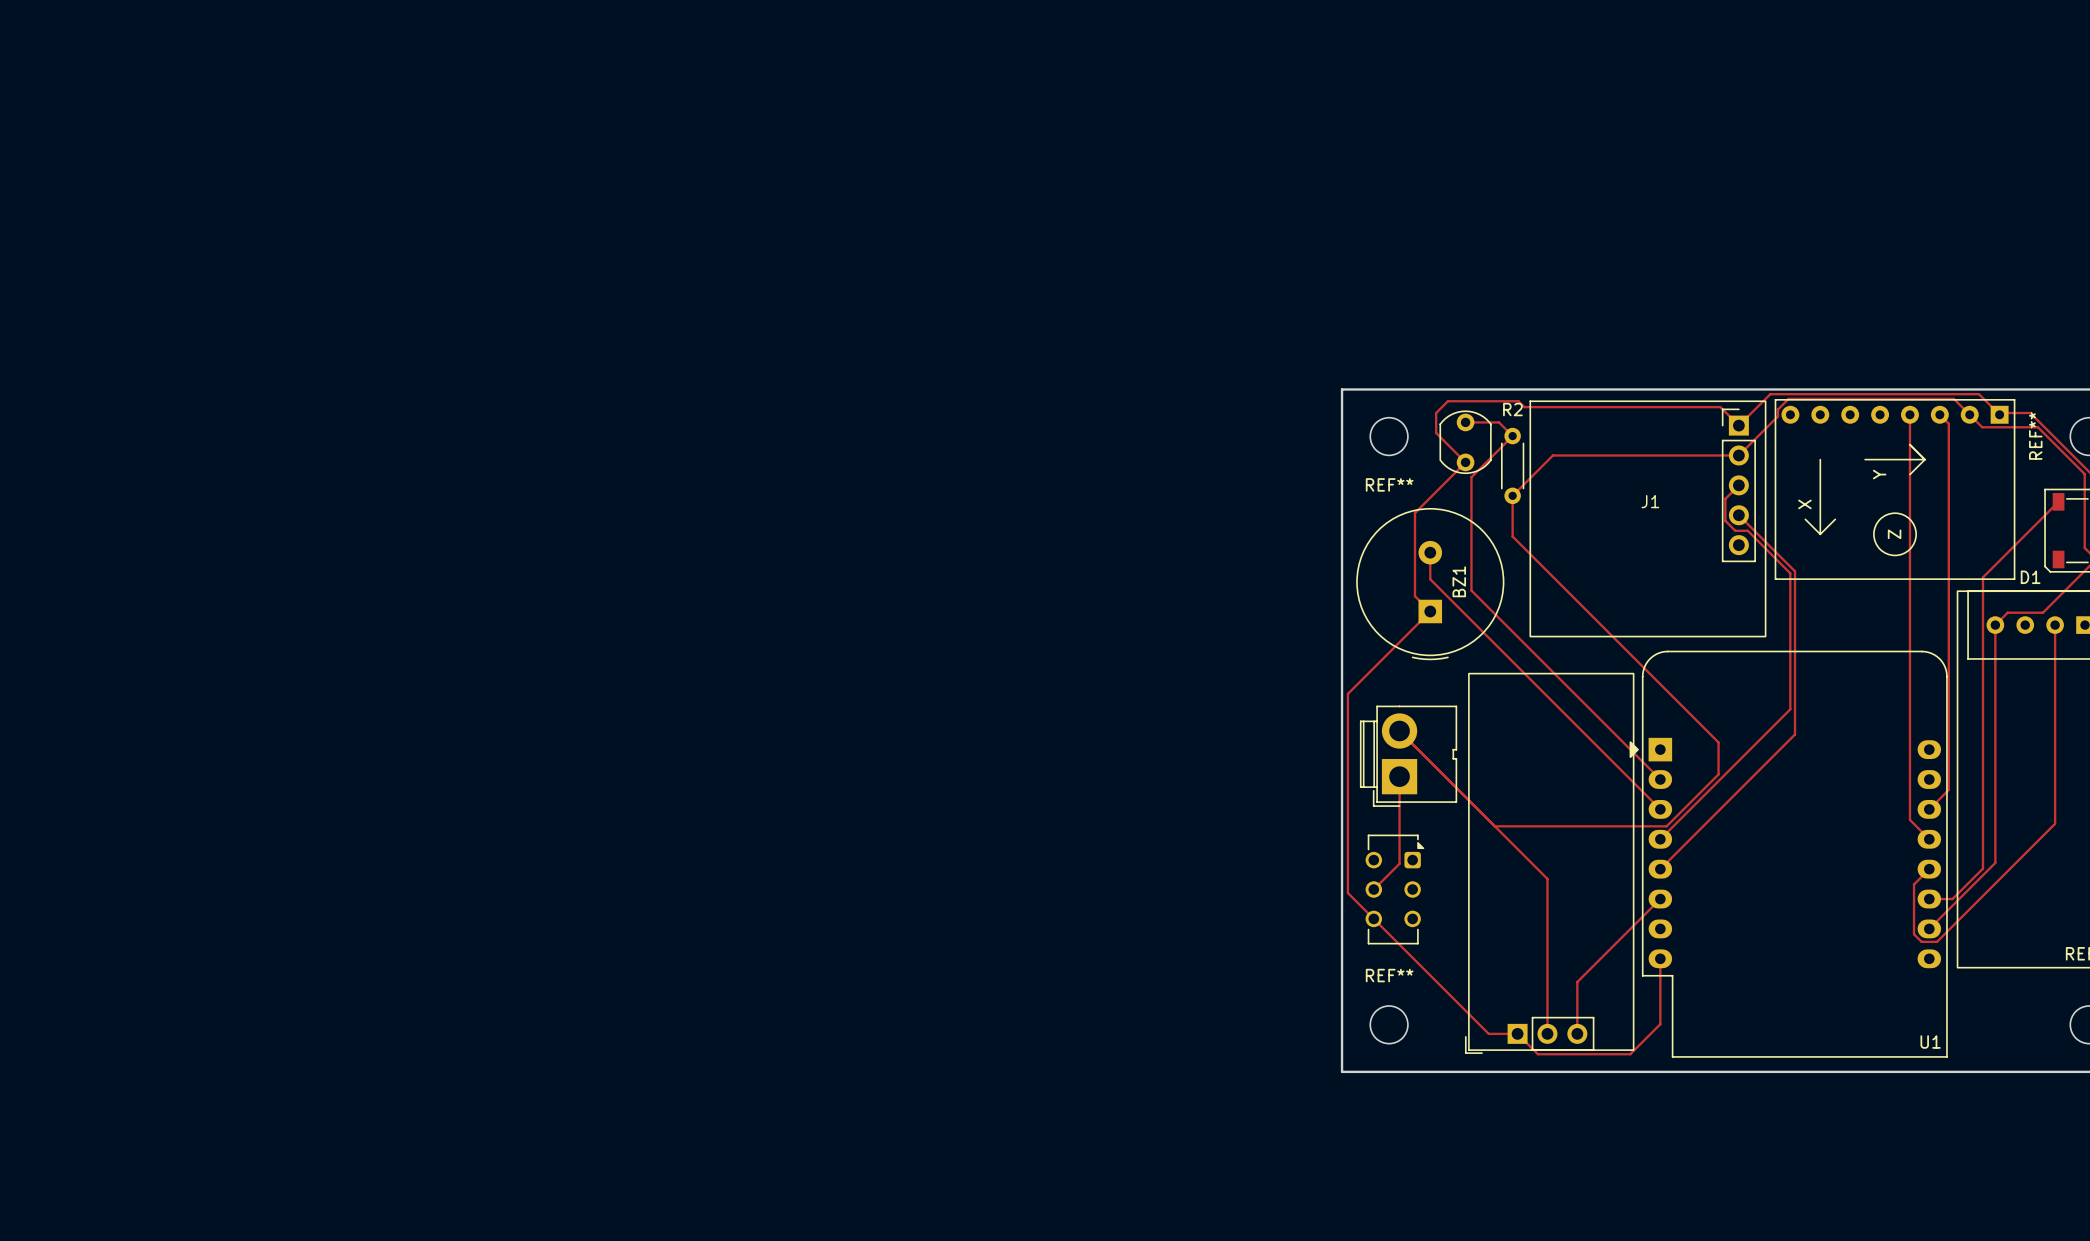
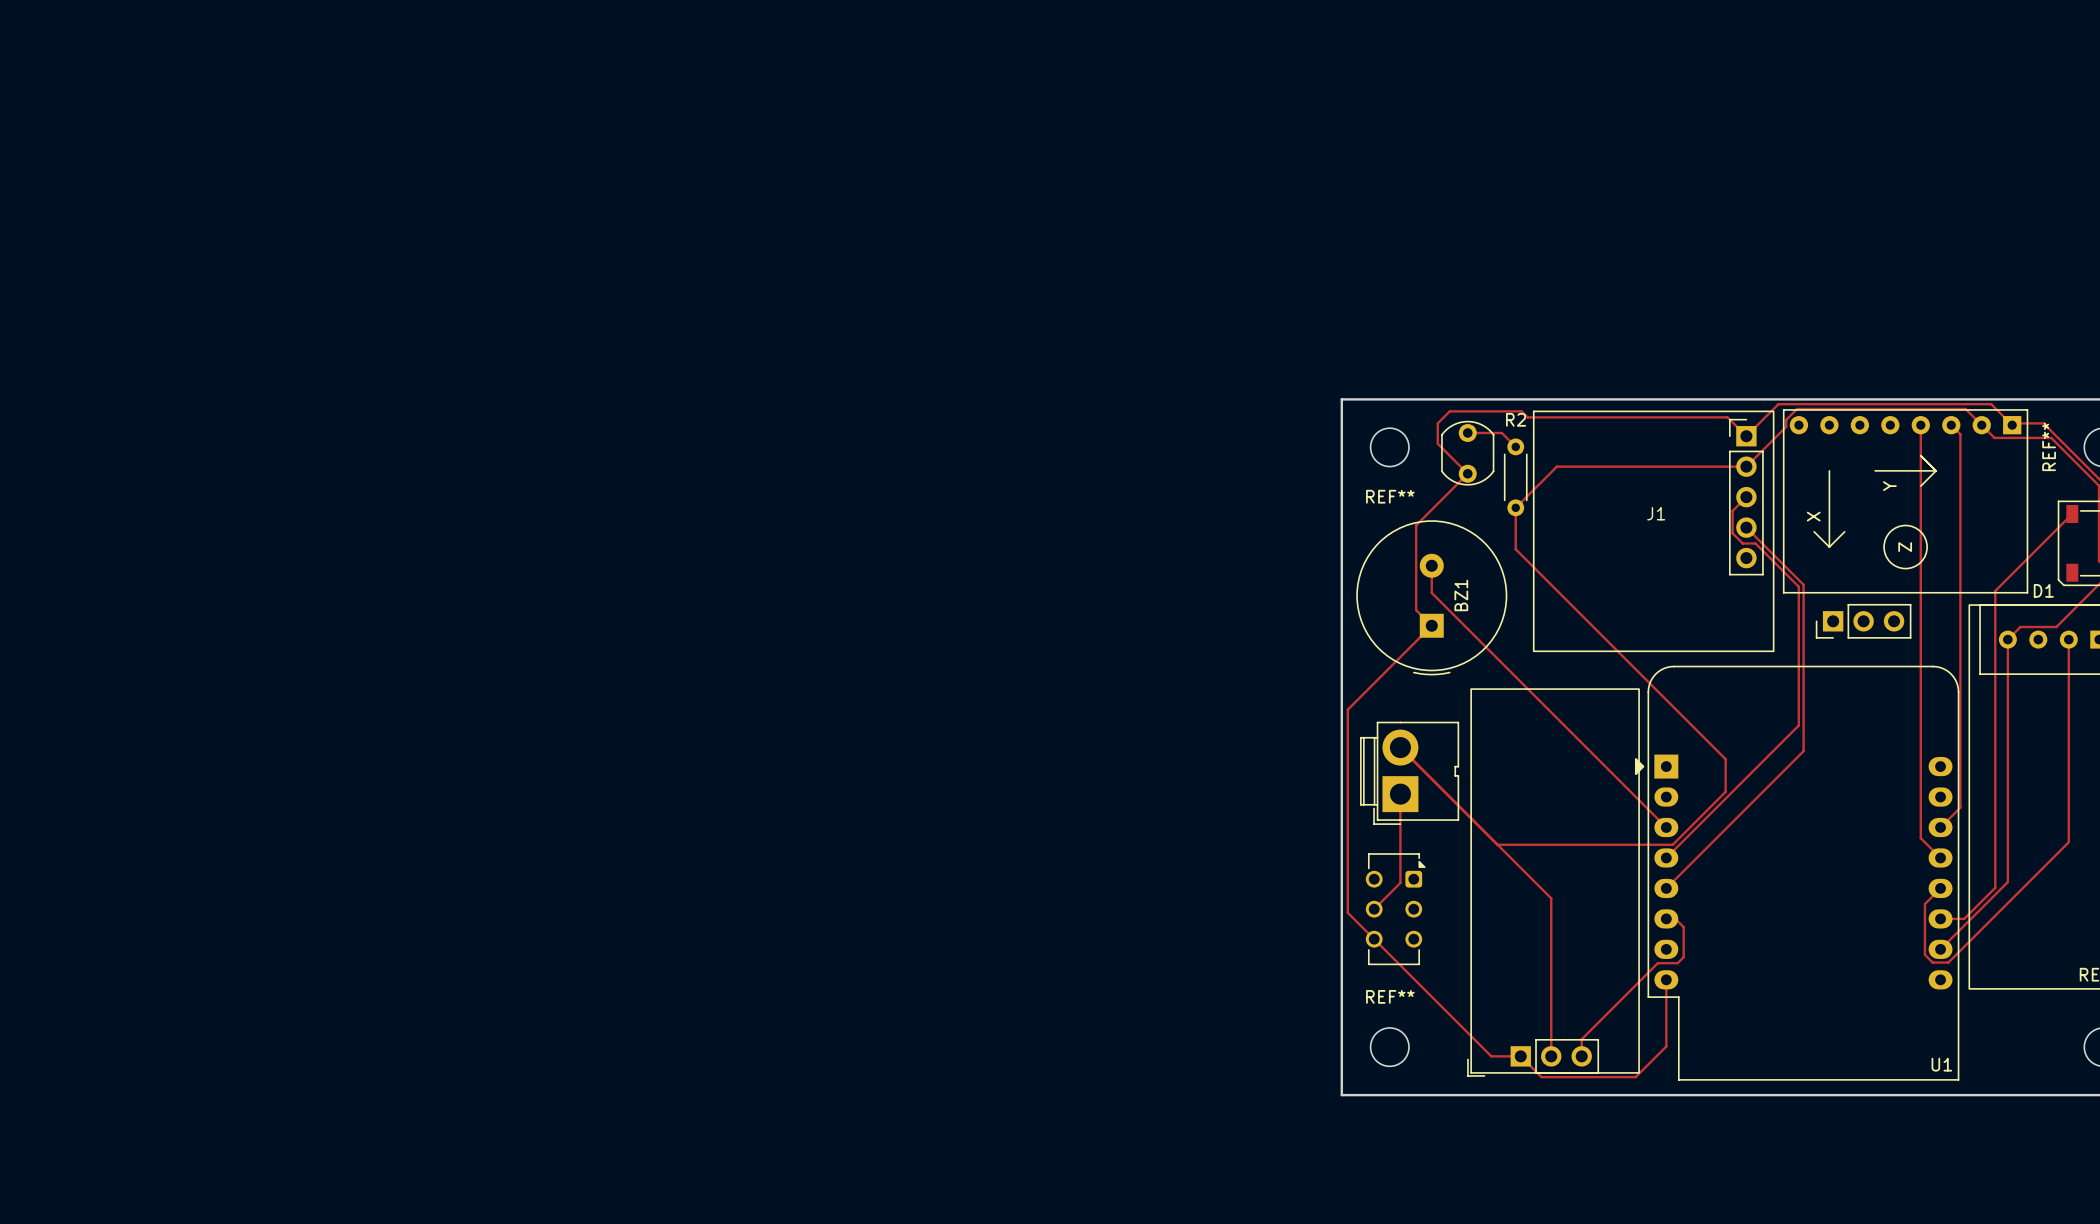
track: (1509, 432) (1512, 436) (1471, 477) (1471, 590) (1660, 779) -> none
part: none -> (1863, 621)
track: (1660, 899) (1577, 982) (1577, 1017) -> (1666, 918) (1675, 918) (1683, 927) (1683, 957) (1677, 963) (1657, 963) (1581, 1039)

